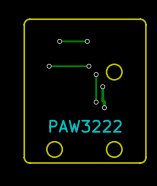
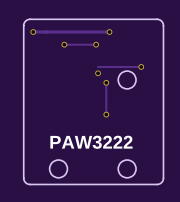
via: none -> (33, 32)
track: none -> (109, 32) (33, 32)
via: none -> (109, 32)
track: none -> (141, 66) (98, 66)
via: none -> (141, 66)
via: (49, 66) -> none
track: (88, 66) (49, 66) -> none
track: (102, 86) (104, 107) -> none
via: (102, 86) -> none
via: (104, 107) -> none

